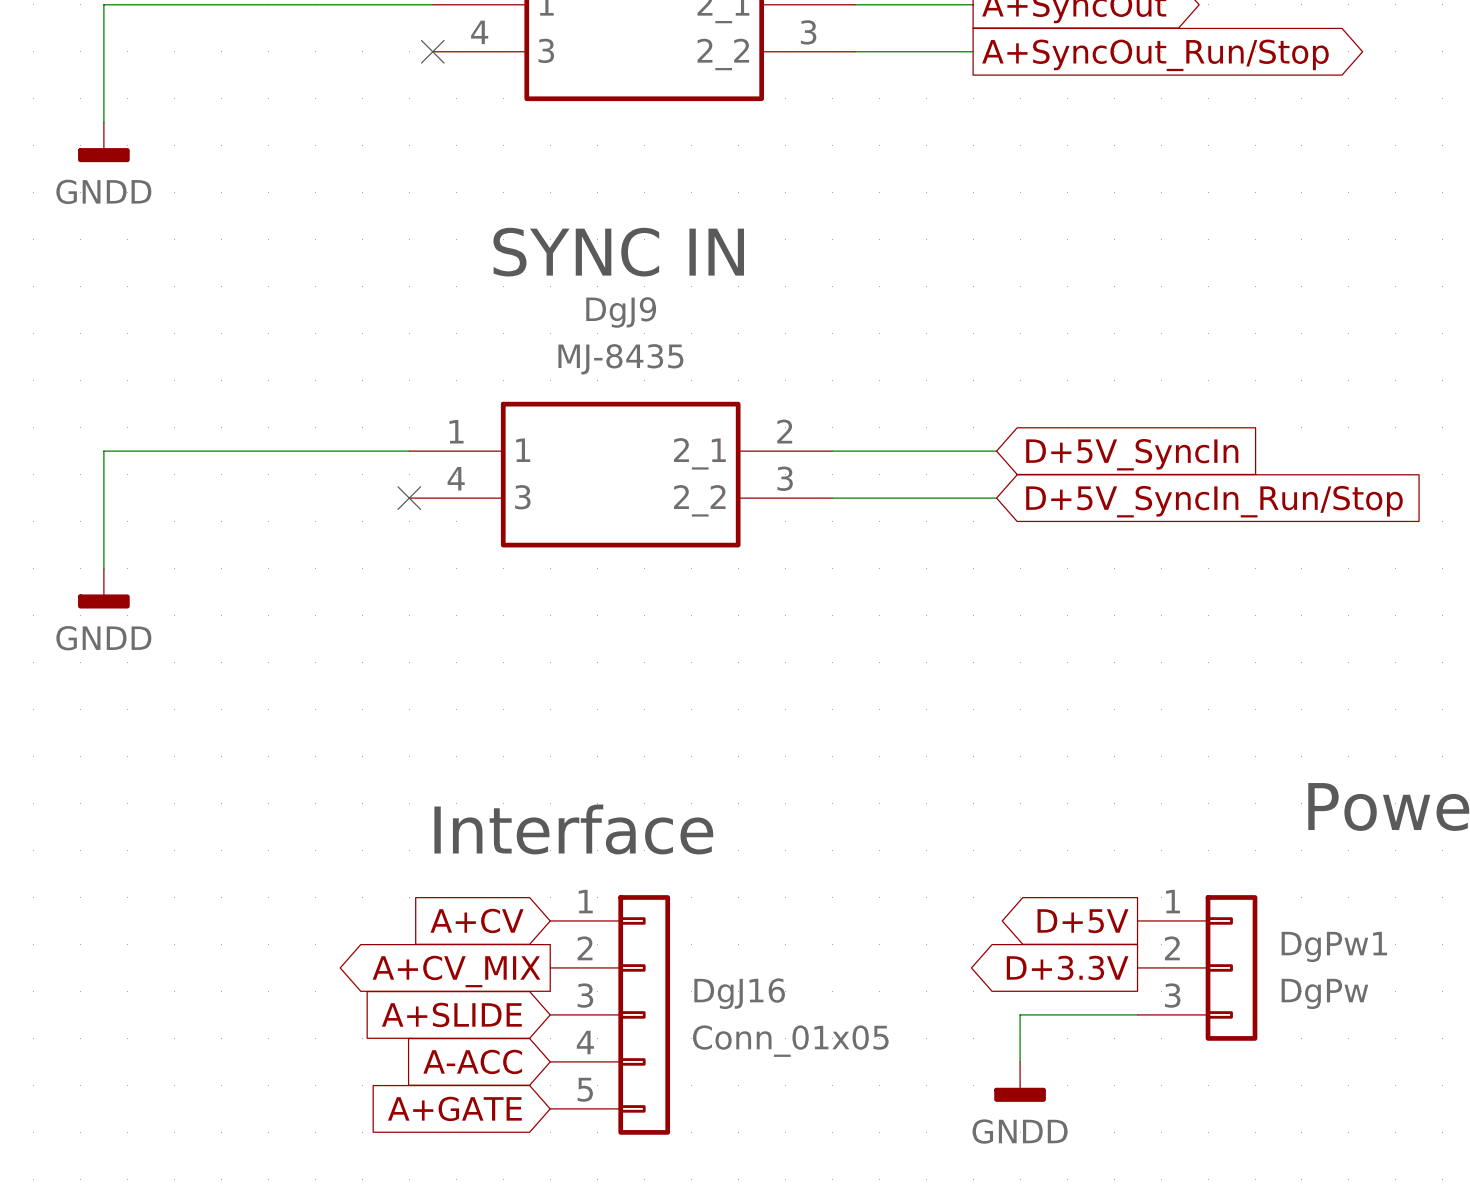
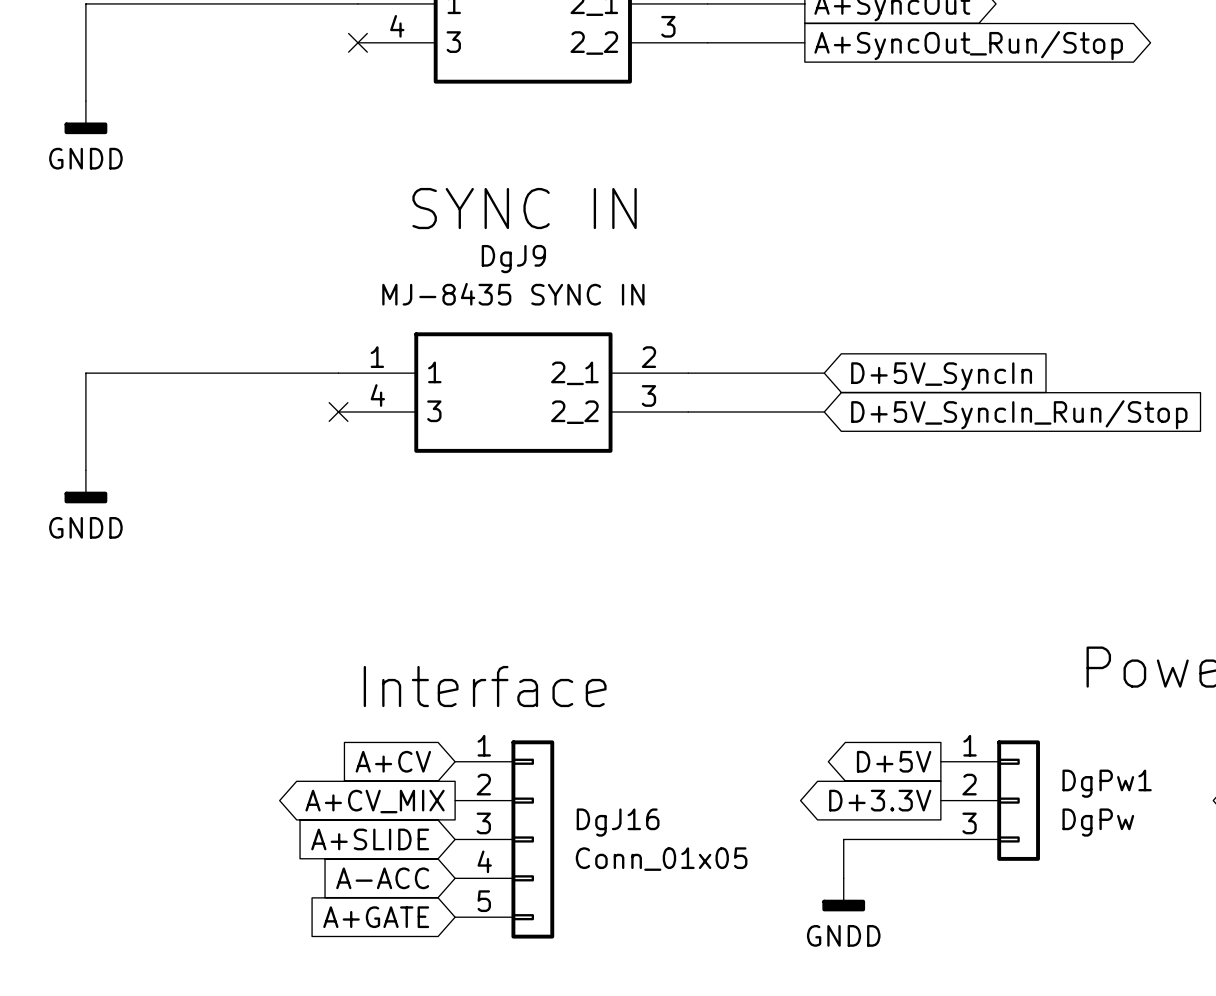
DgJ9 value: MJ-8435 (620, 359) -> MJ-8435 SYNC IN (513, 294)

